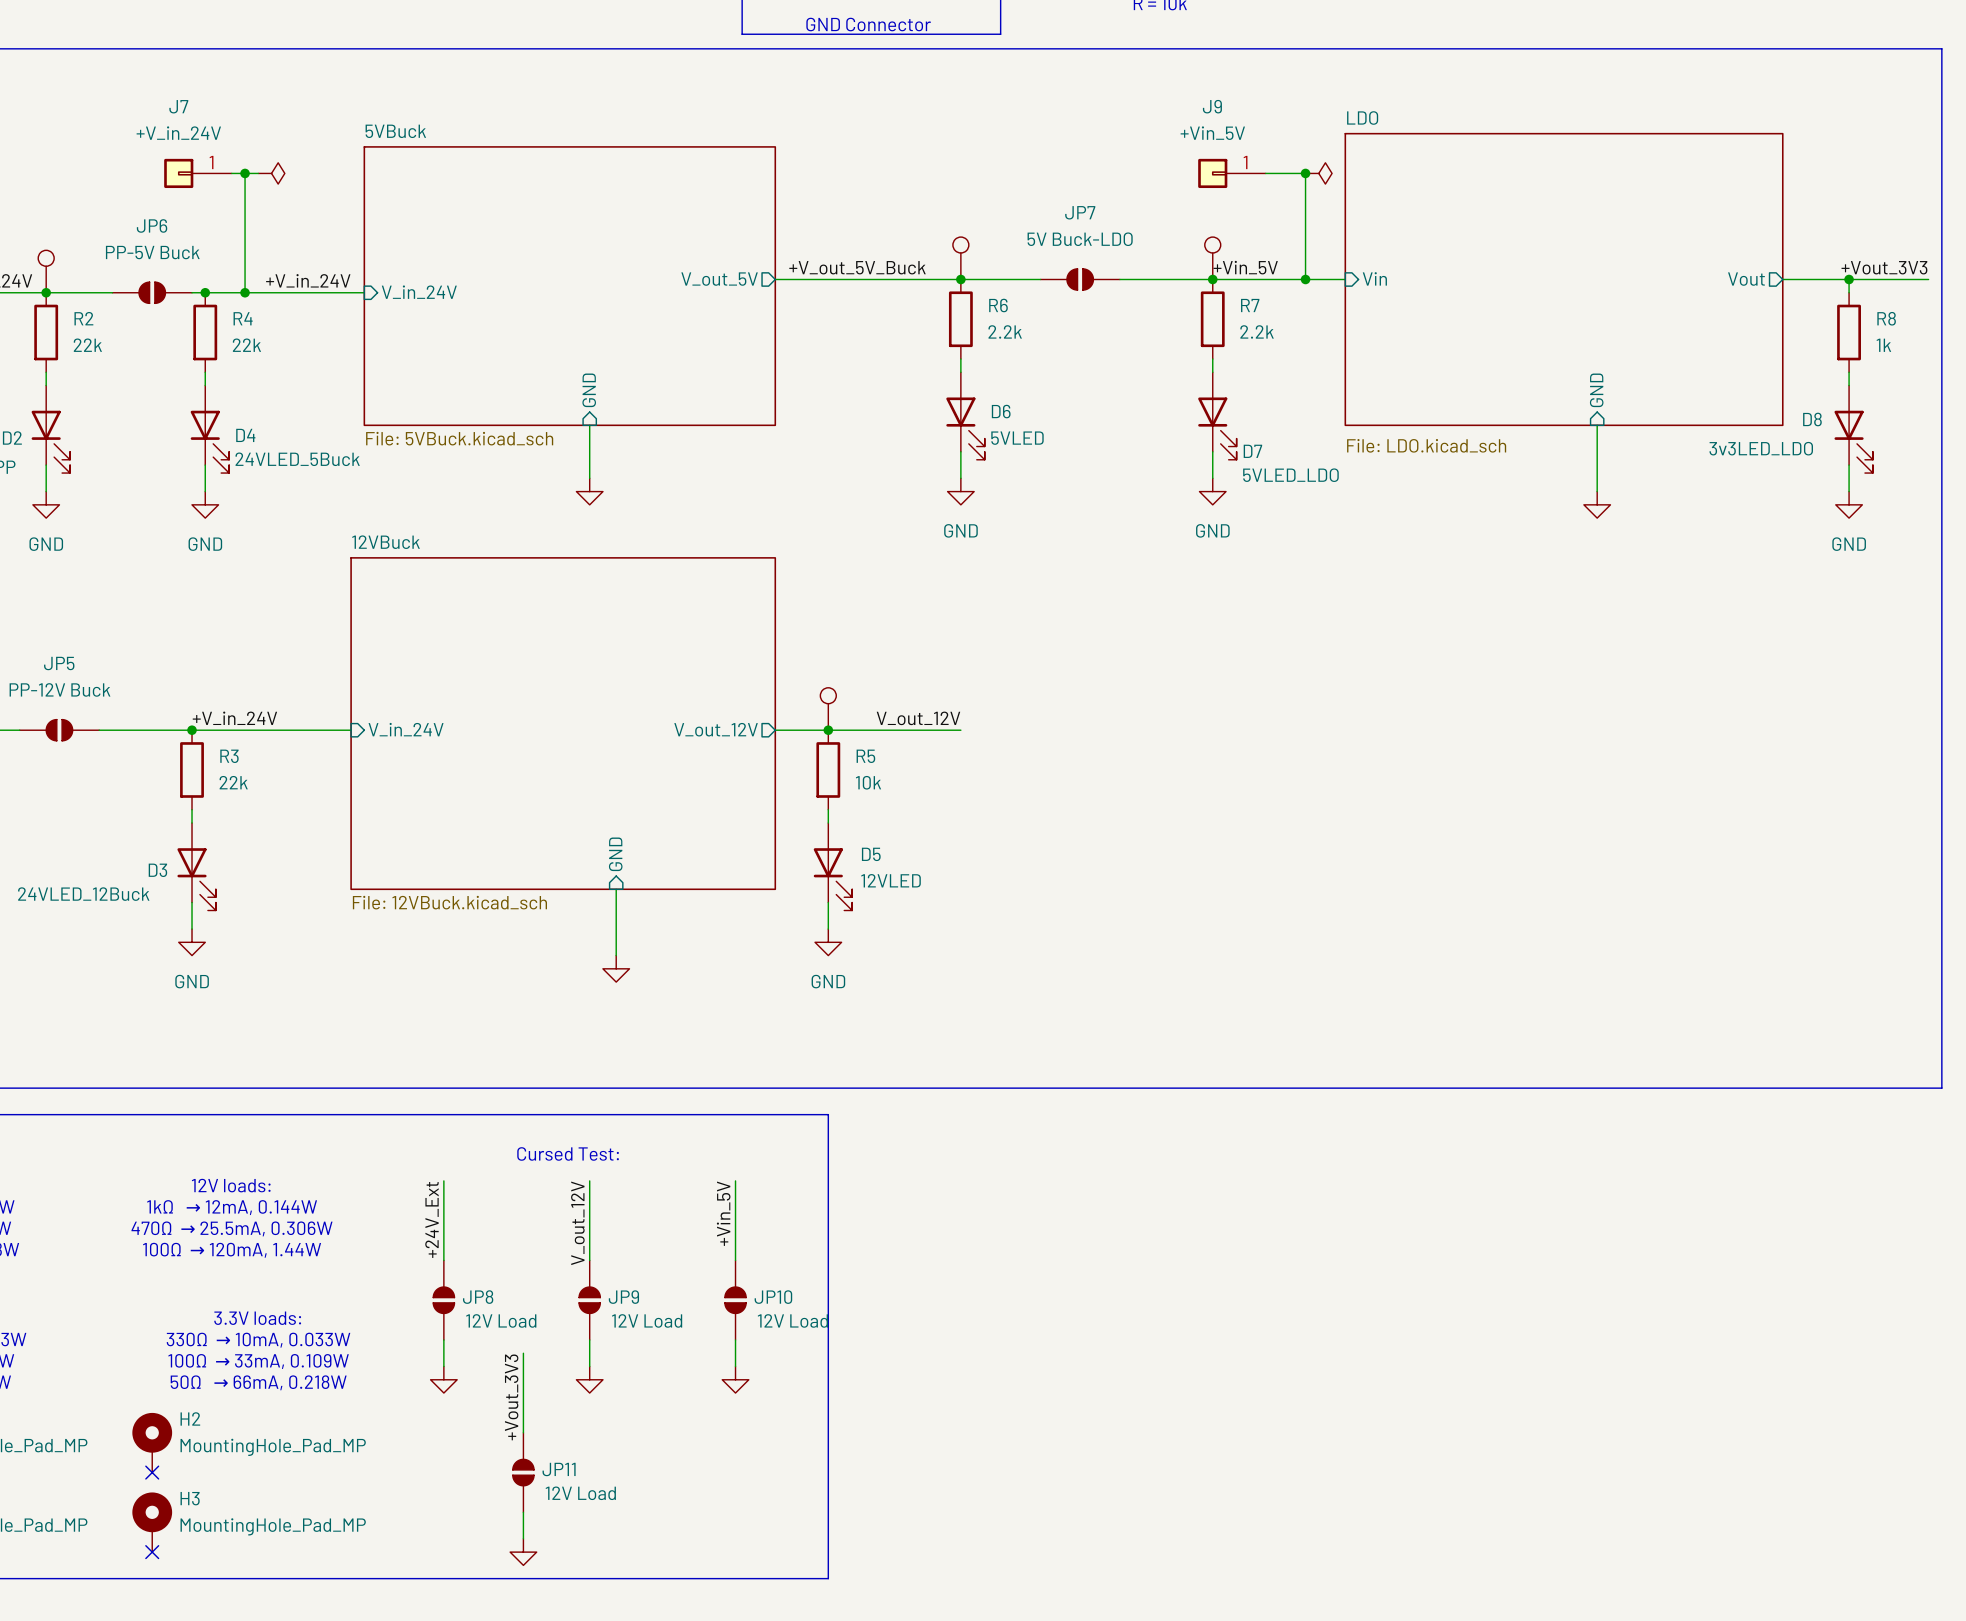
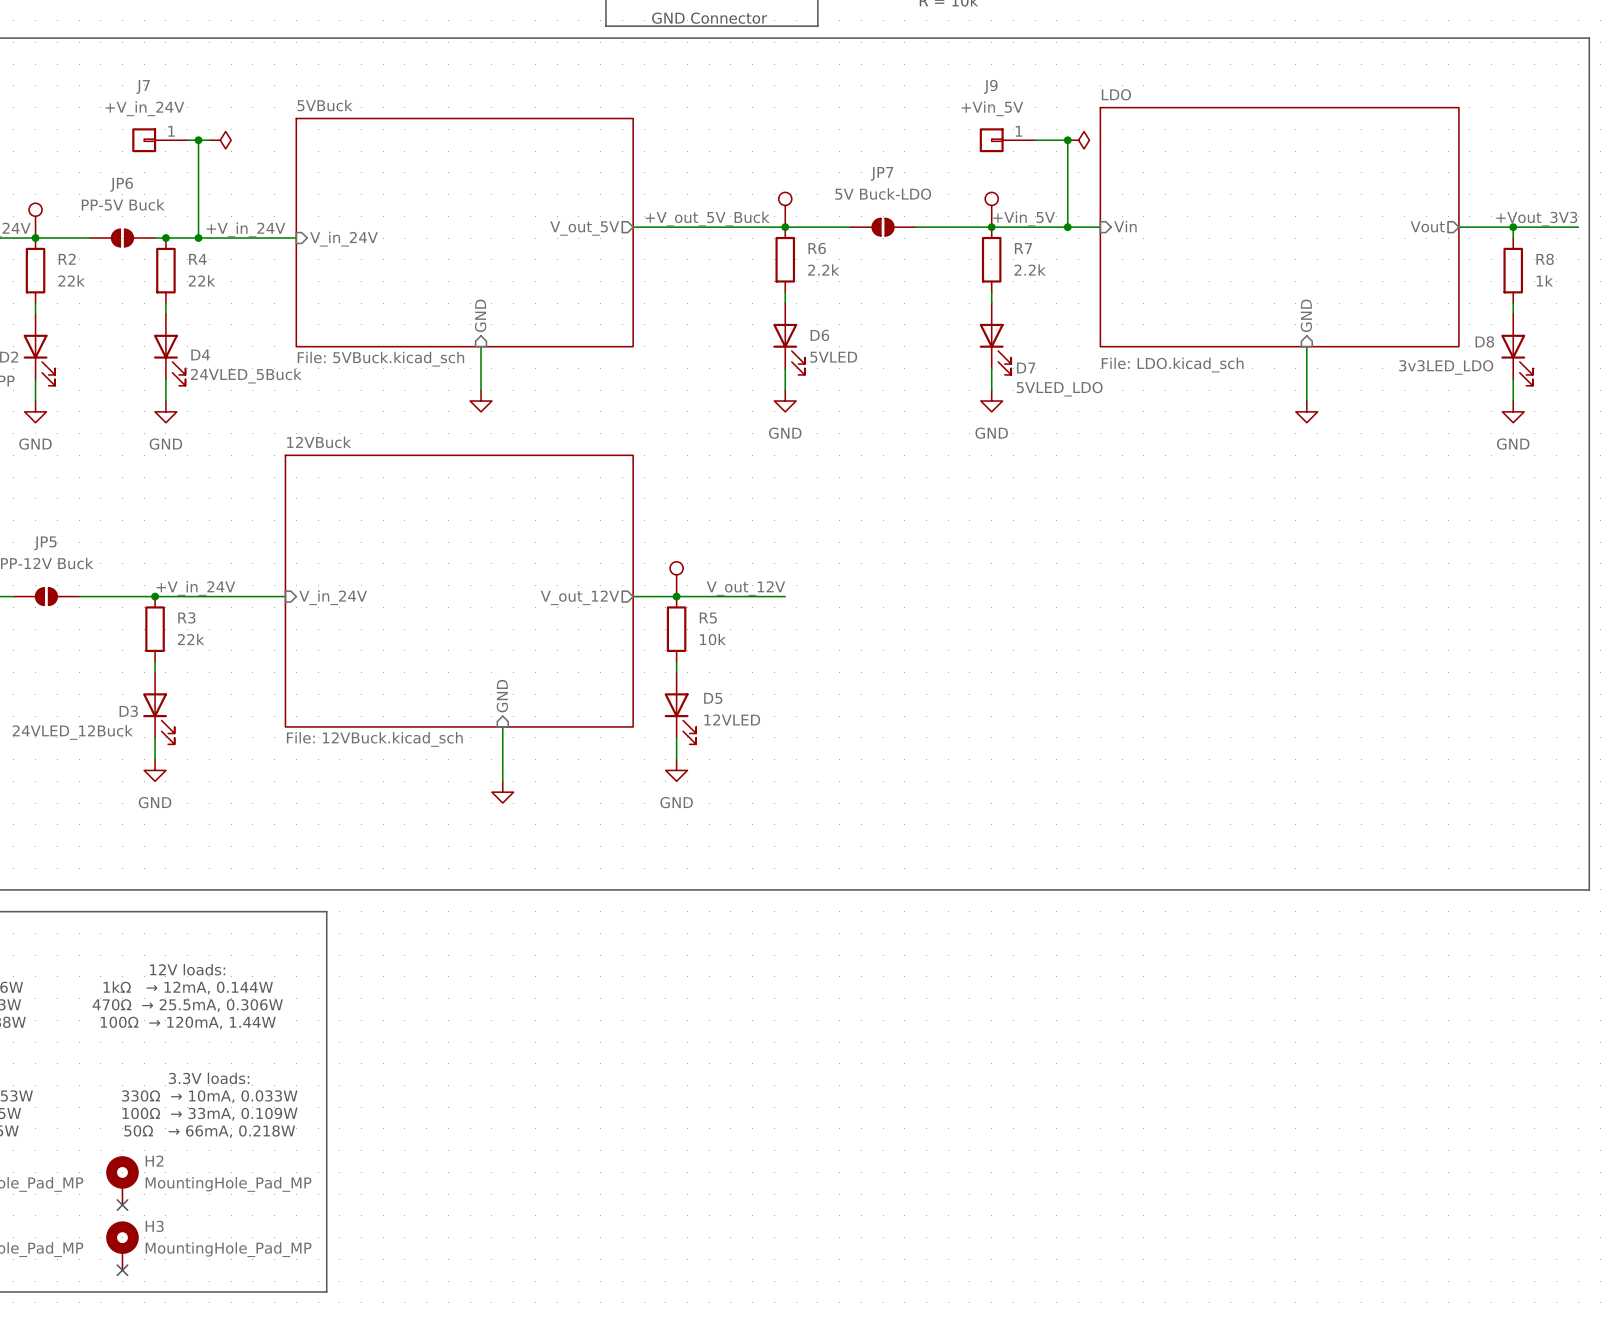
line: (401, 1114) (828, 1114) (828, 1578) (401, 1578) -> (326, 911) (326, 1291)
text: Cursed Test: (568, 1153) -> none
wire: (443, 1180) (443, 1260) -> none
wire: (589, 1180) (589, 1260) -> none
wire: (735, 1180) (735, 1260) -> none
label: +Vin_5V (723, 1213) -> none
label: +24V_Ext (431, 1219) -> none
label: V_out_12V (577, 1223) -> none
JP8: 12V Load (443, 1300) -> none
JP9: 12V Load (589, 1300) -> none
JP10: 12V Load (735, 1300) -> none
wire: (443, 1340) (443, 1366) -> none
wire: (589, 1340) (589, 1366) -> none
wire: (735, 1340) (735, 1366) -> none
wire: (523, 1353) (523, 1432) -> none
power symbol: (443, 1379) -> none
power symbol: (589, 1379) -> none
power symbol: (735, 1379) -> none
label: +Vout_3V3 (511, 1397) -> none
JP11: 12V Load (523, 1472) -> none
wire: (523, 1512) (523, 1538) -> none
power symbol: (523, 1552) -> none

